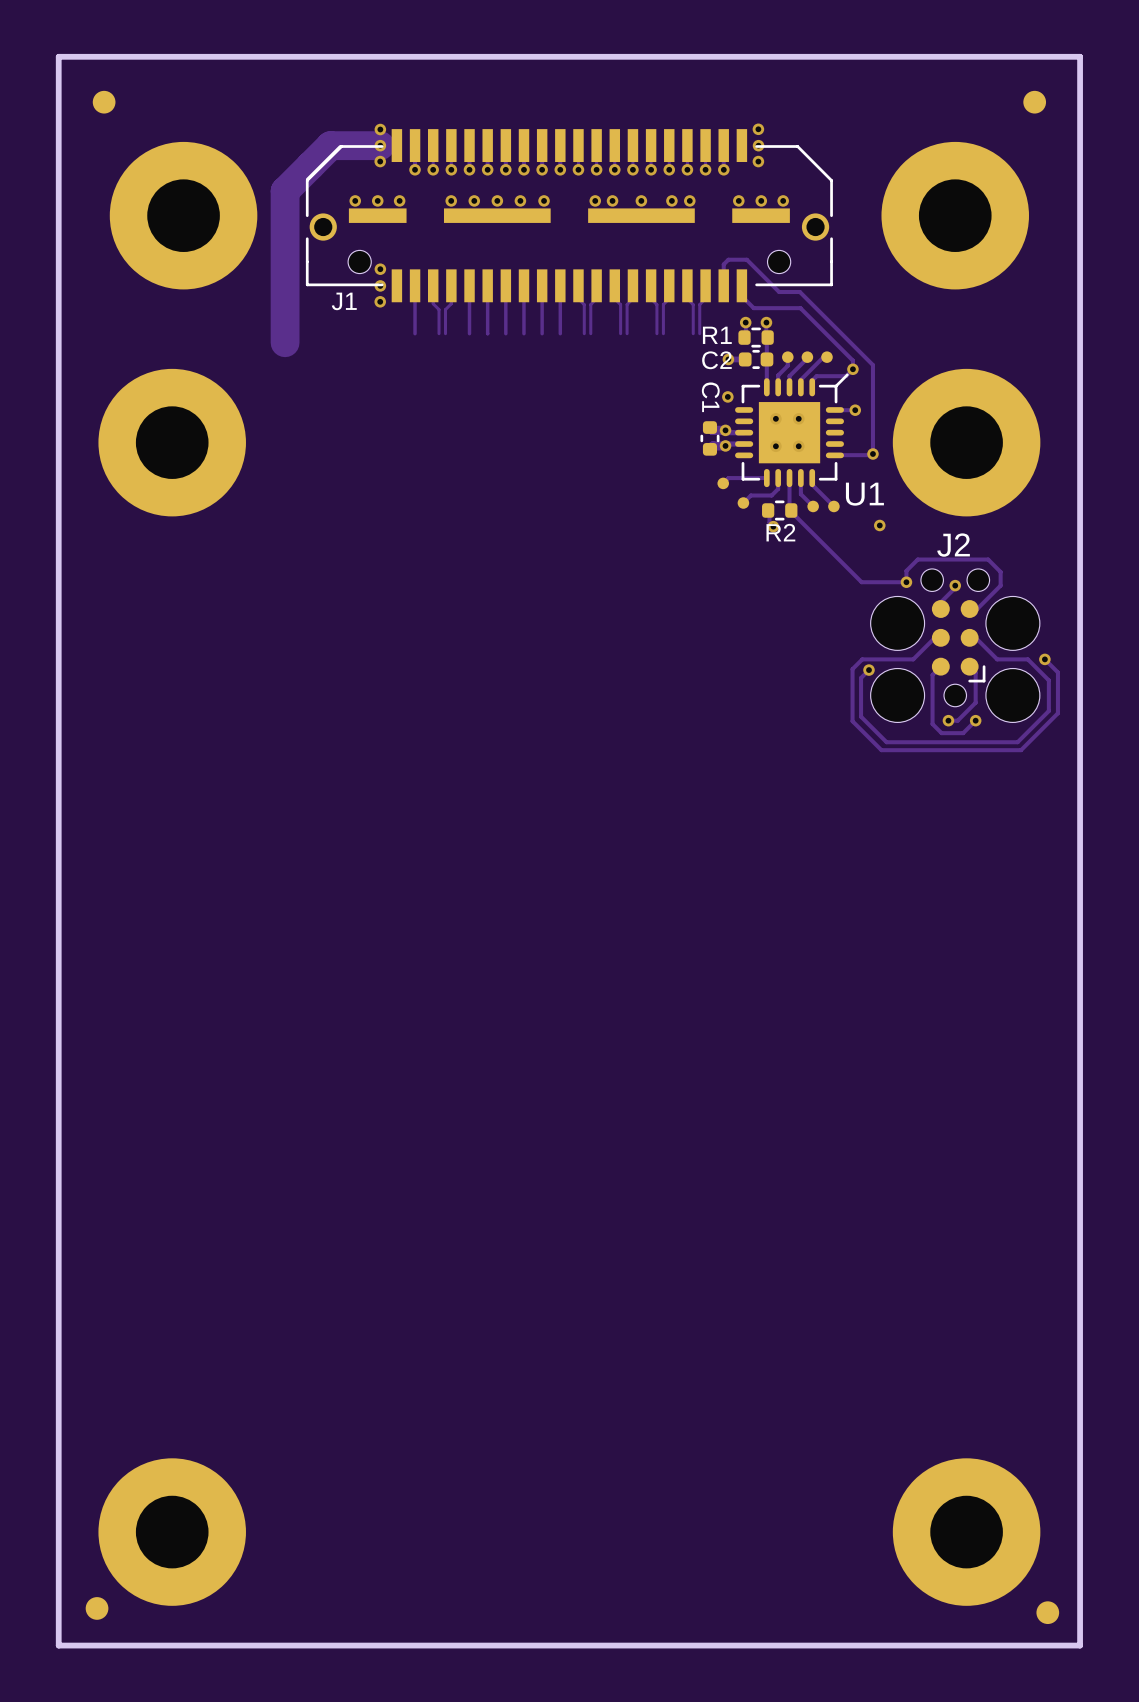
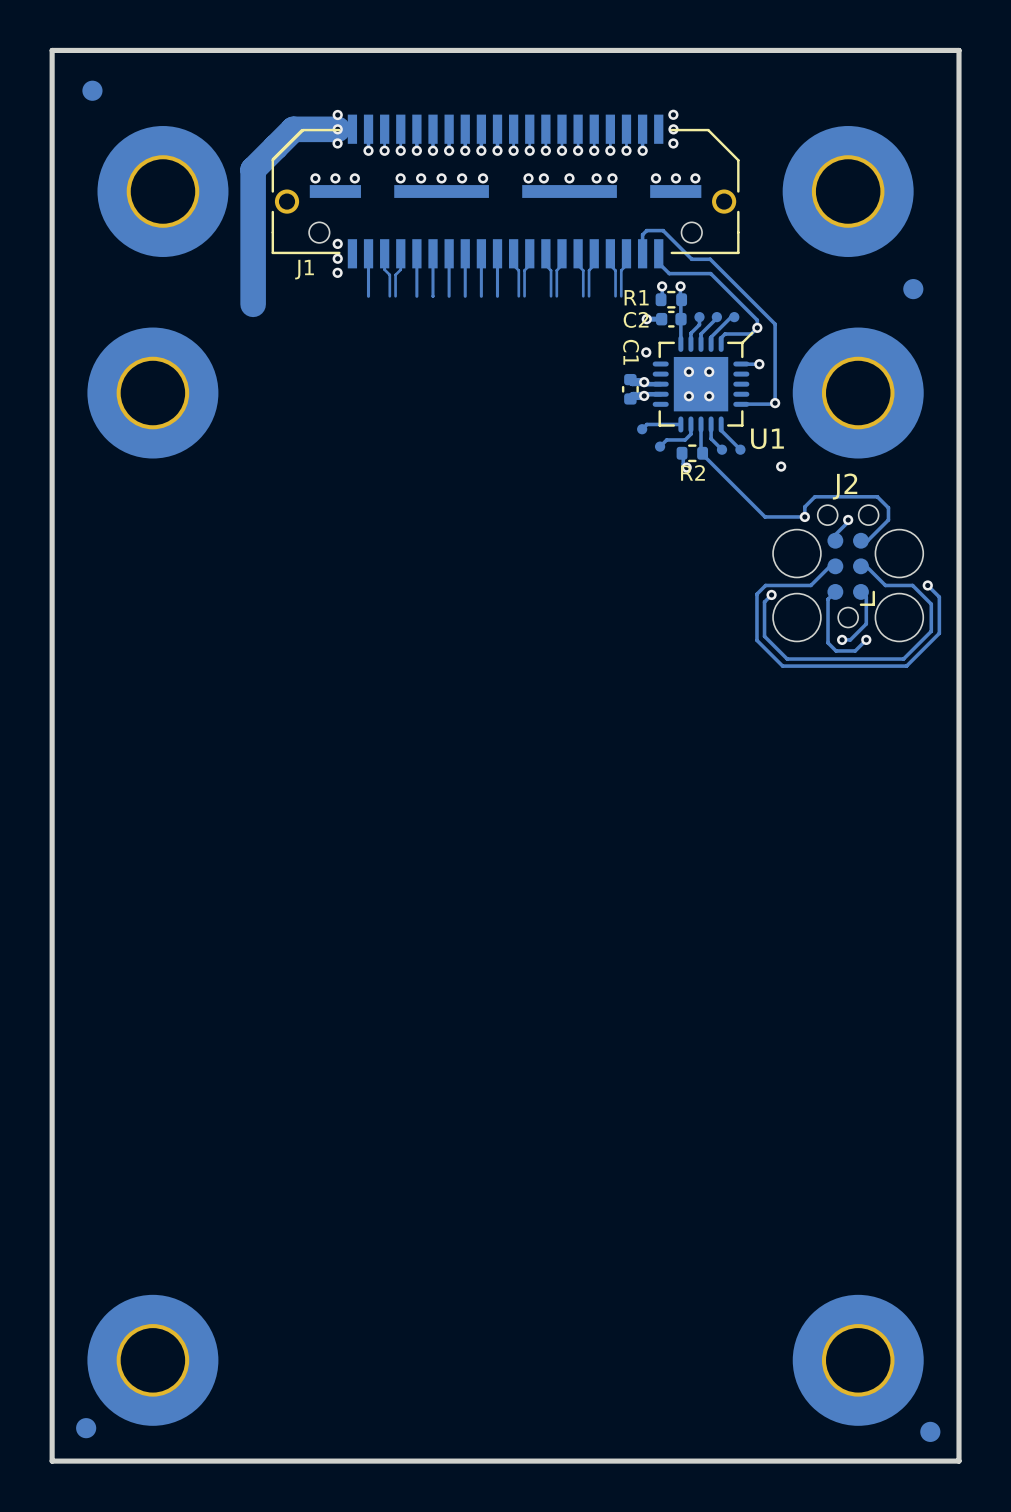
part position: (1034, 102) -> (913, 289)
via: (380, 269) -> none
via: none -> (337, 243)
via: (380, 285) -> none
via: none -> (337, 258)
via: (380, 301) -> none
via: none -> (337, 272)

